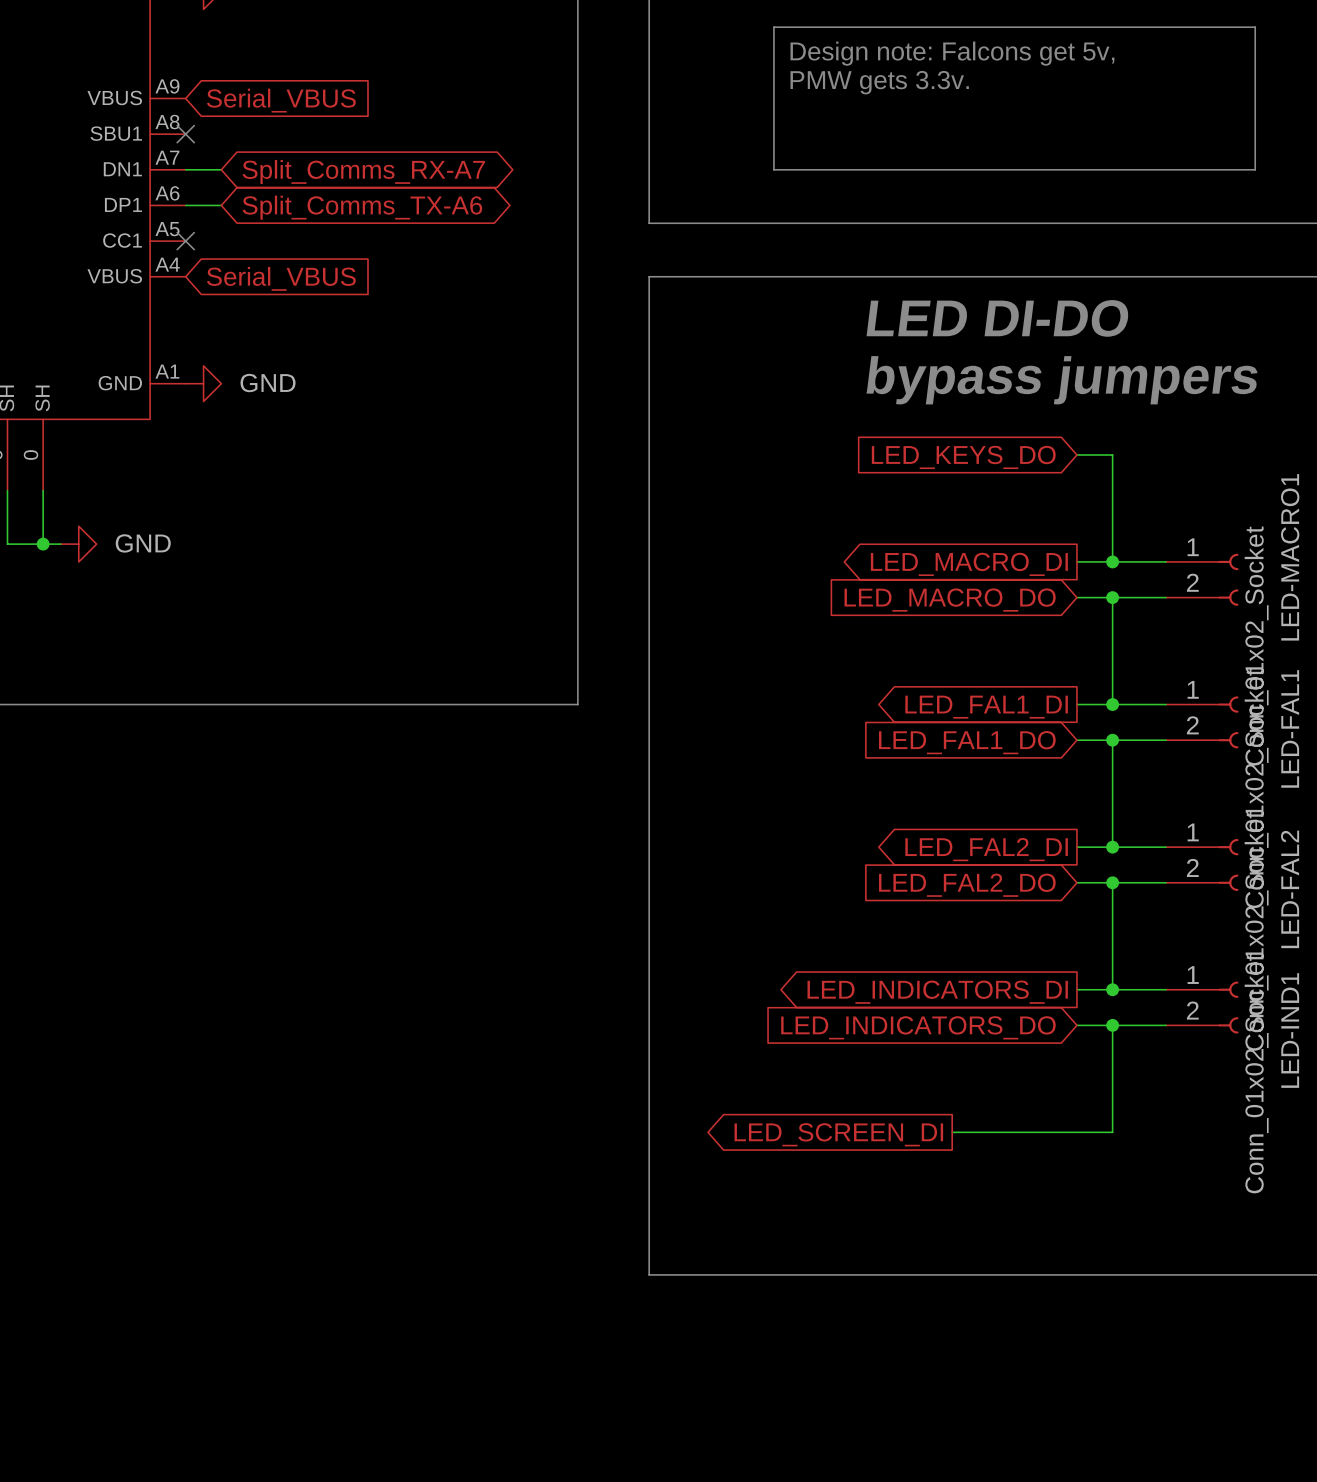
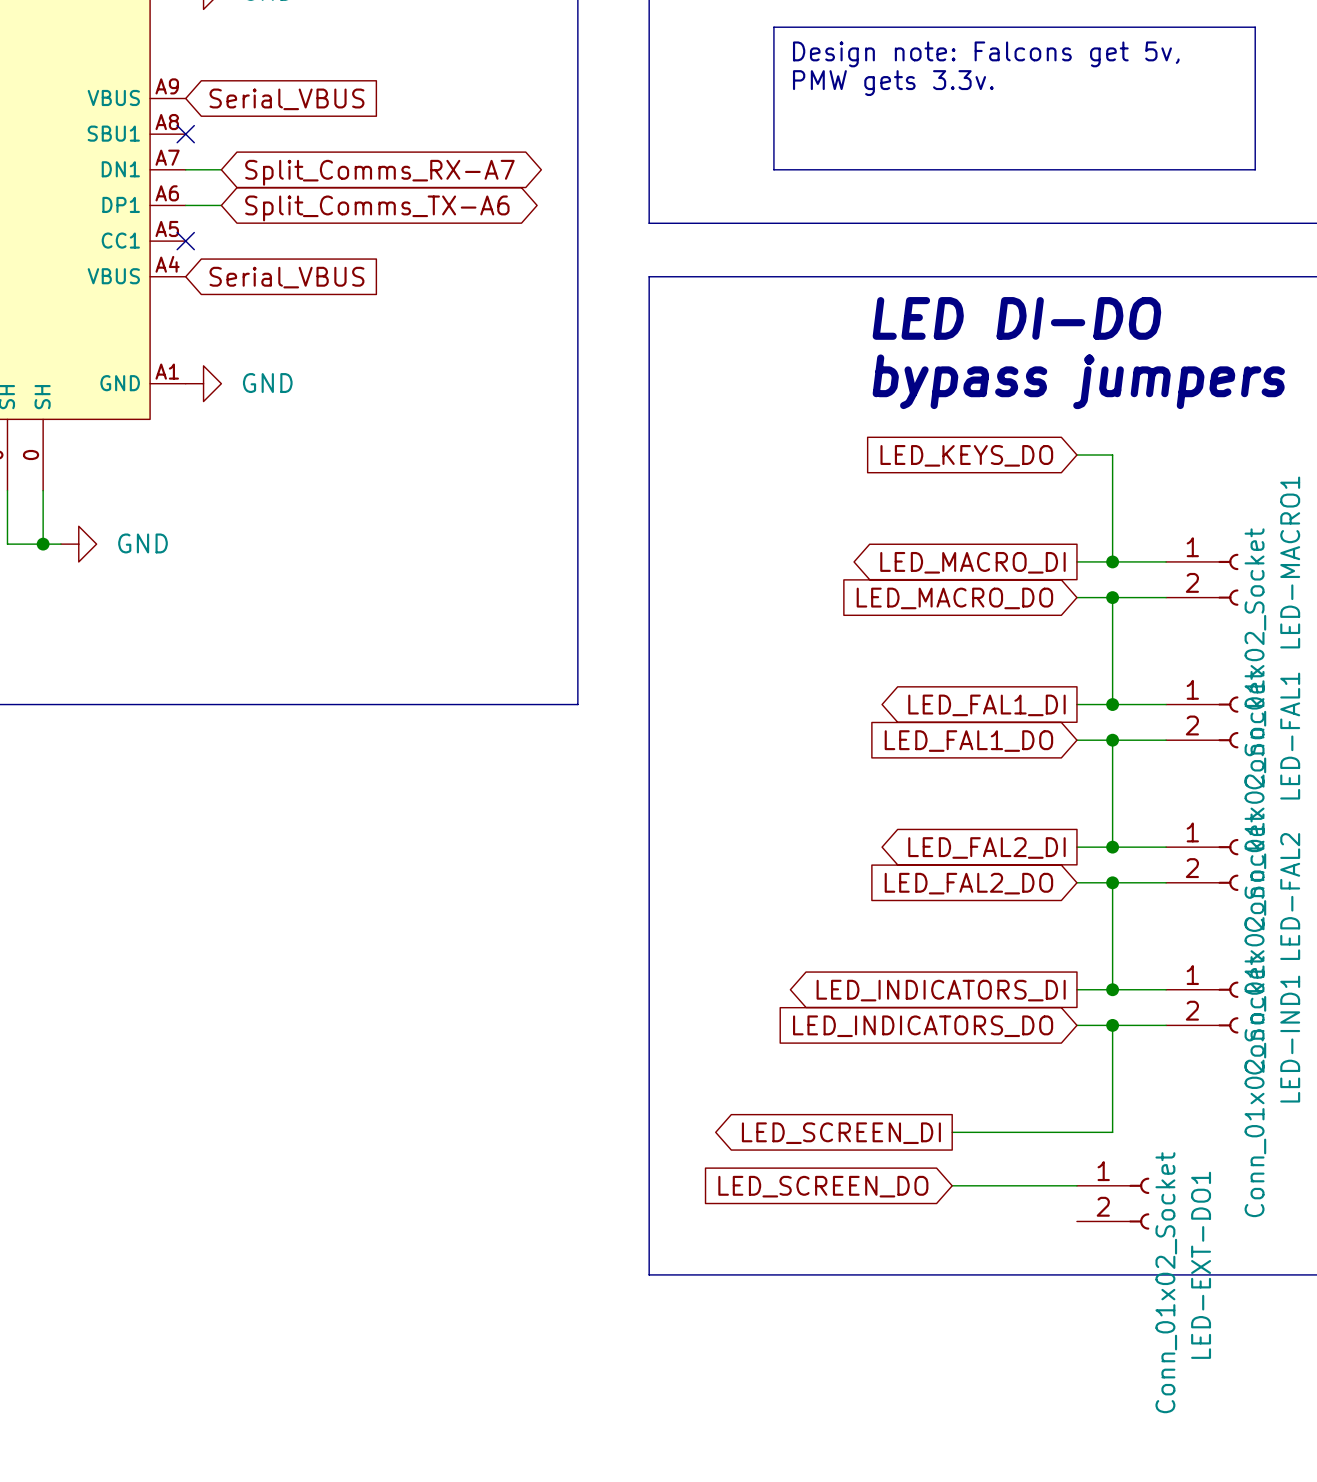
wire: none -> (952, 1185) (1076, 1185)
global label: none -> LED_SCREEN_DO (823, 1186)
LED-EXT-DO1: none -> Conn_01x02_Socket (1113, 1203)

